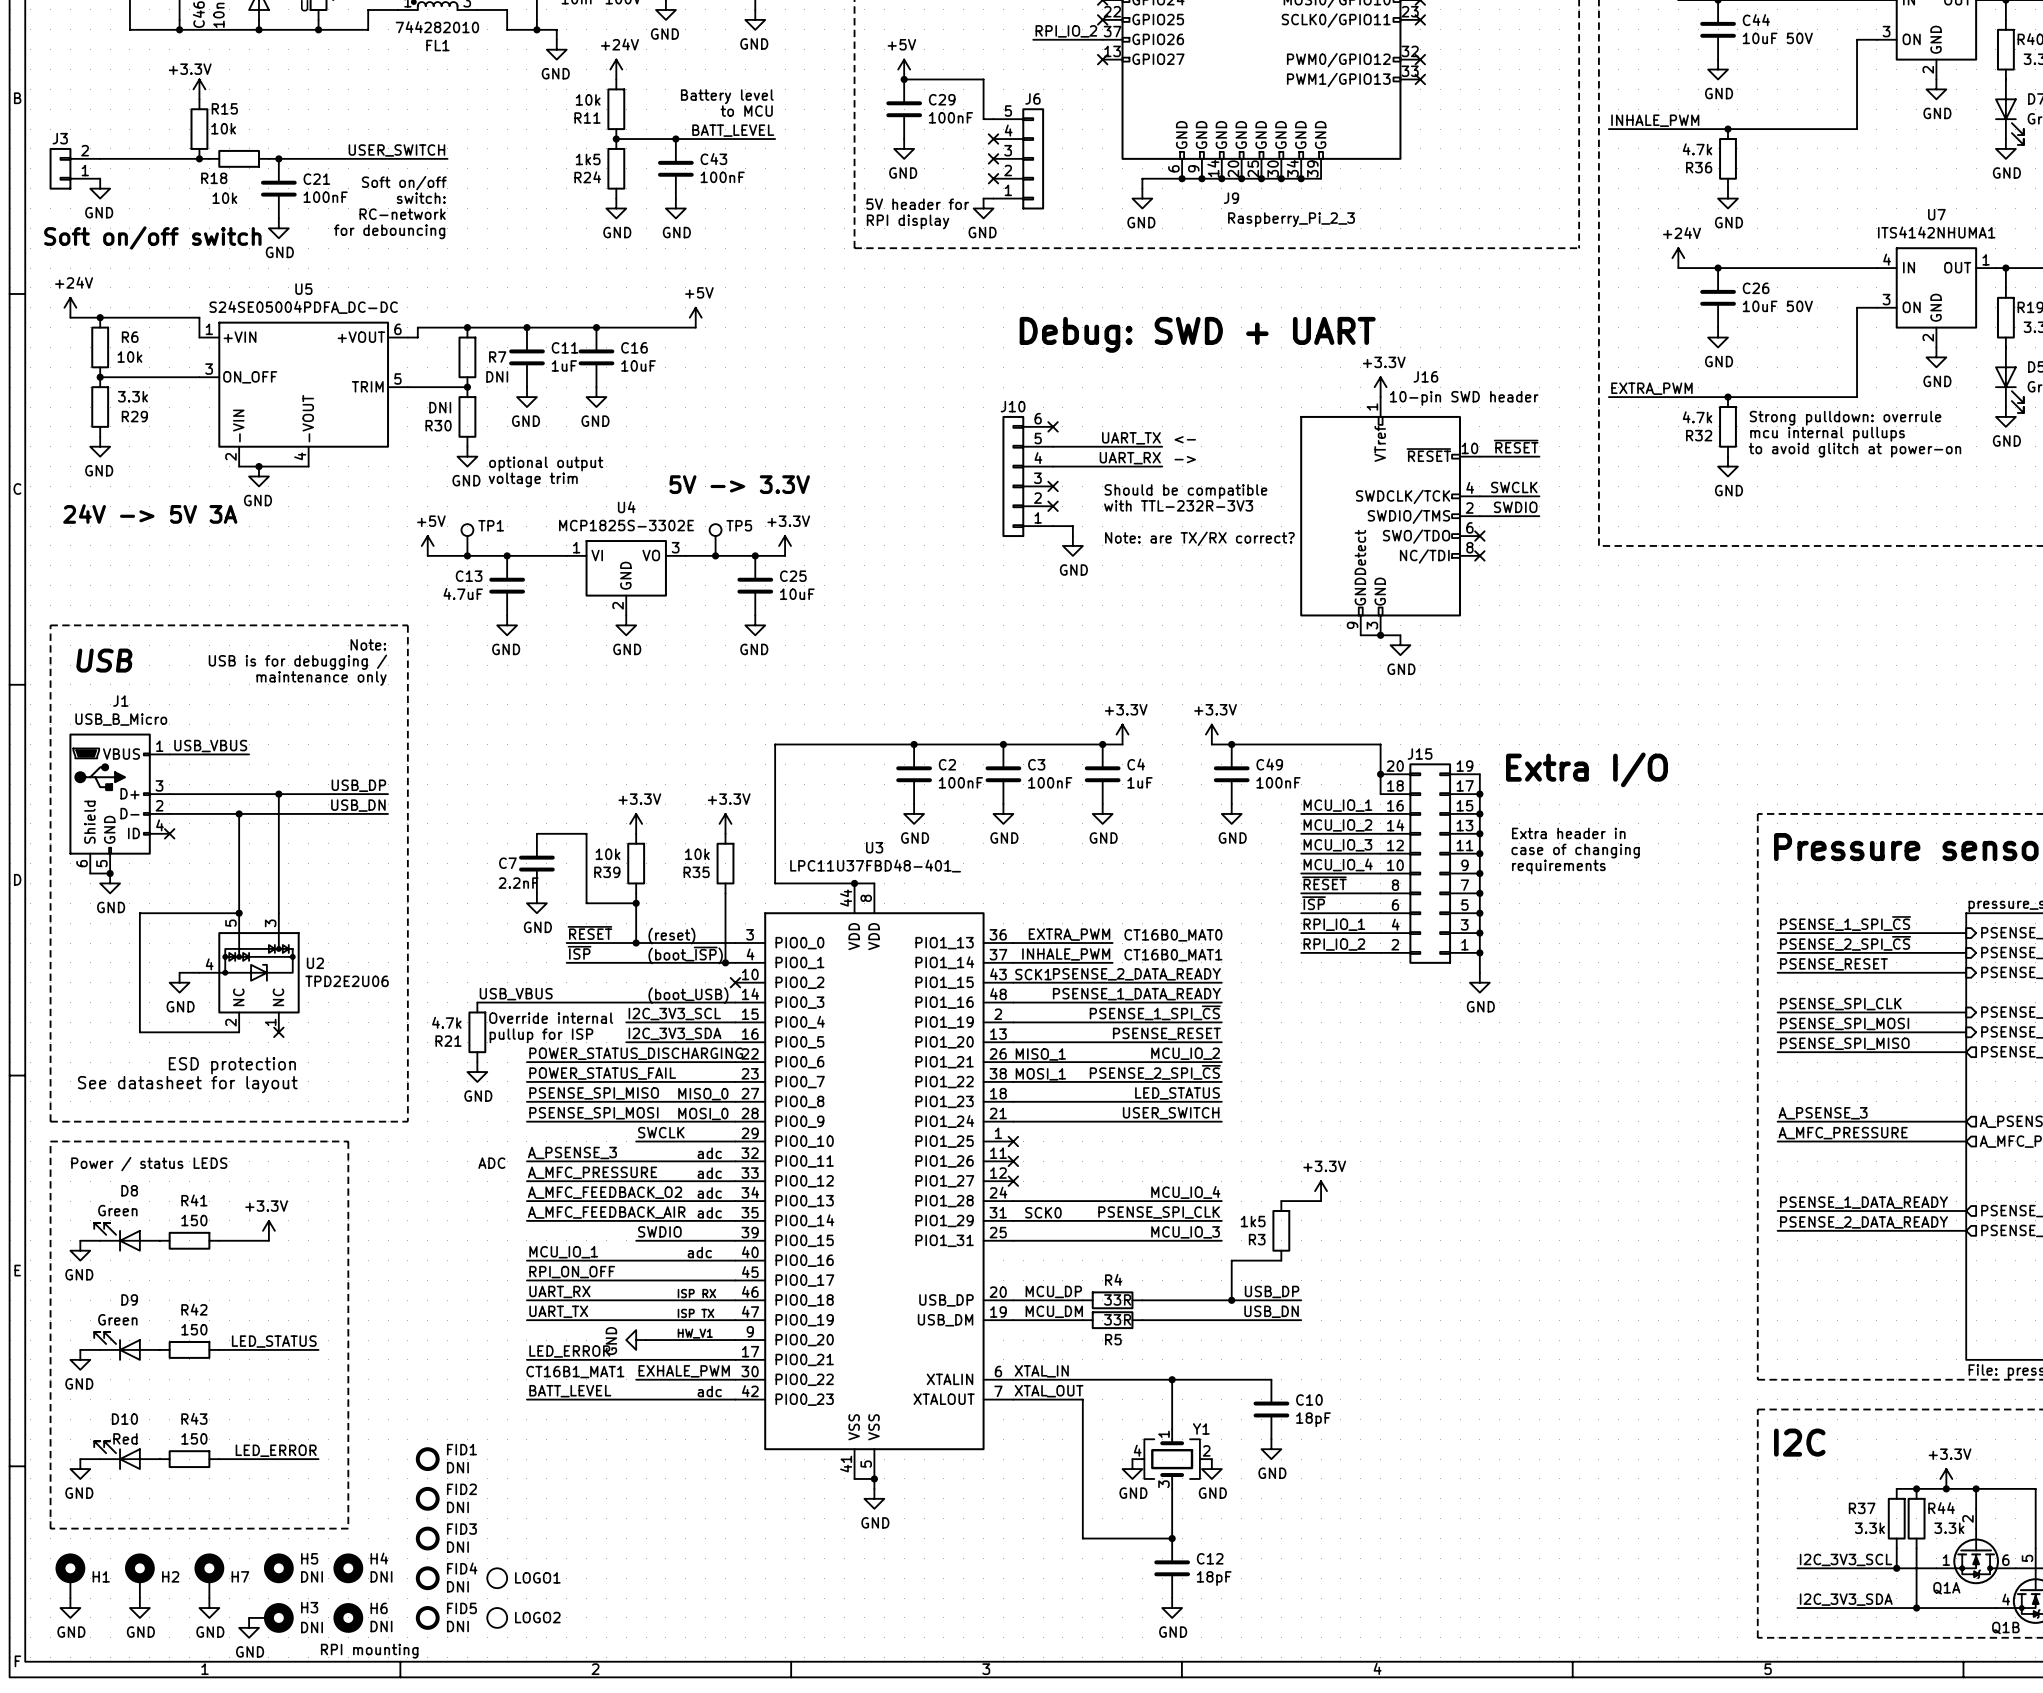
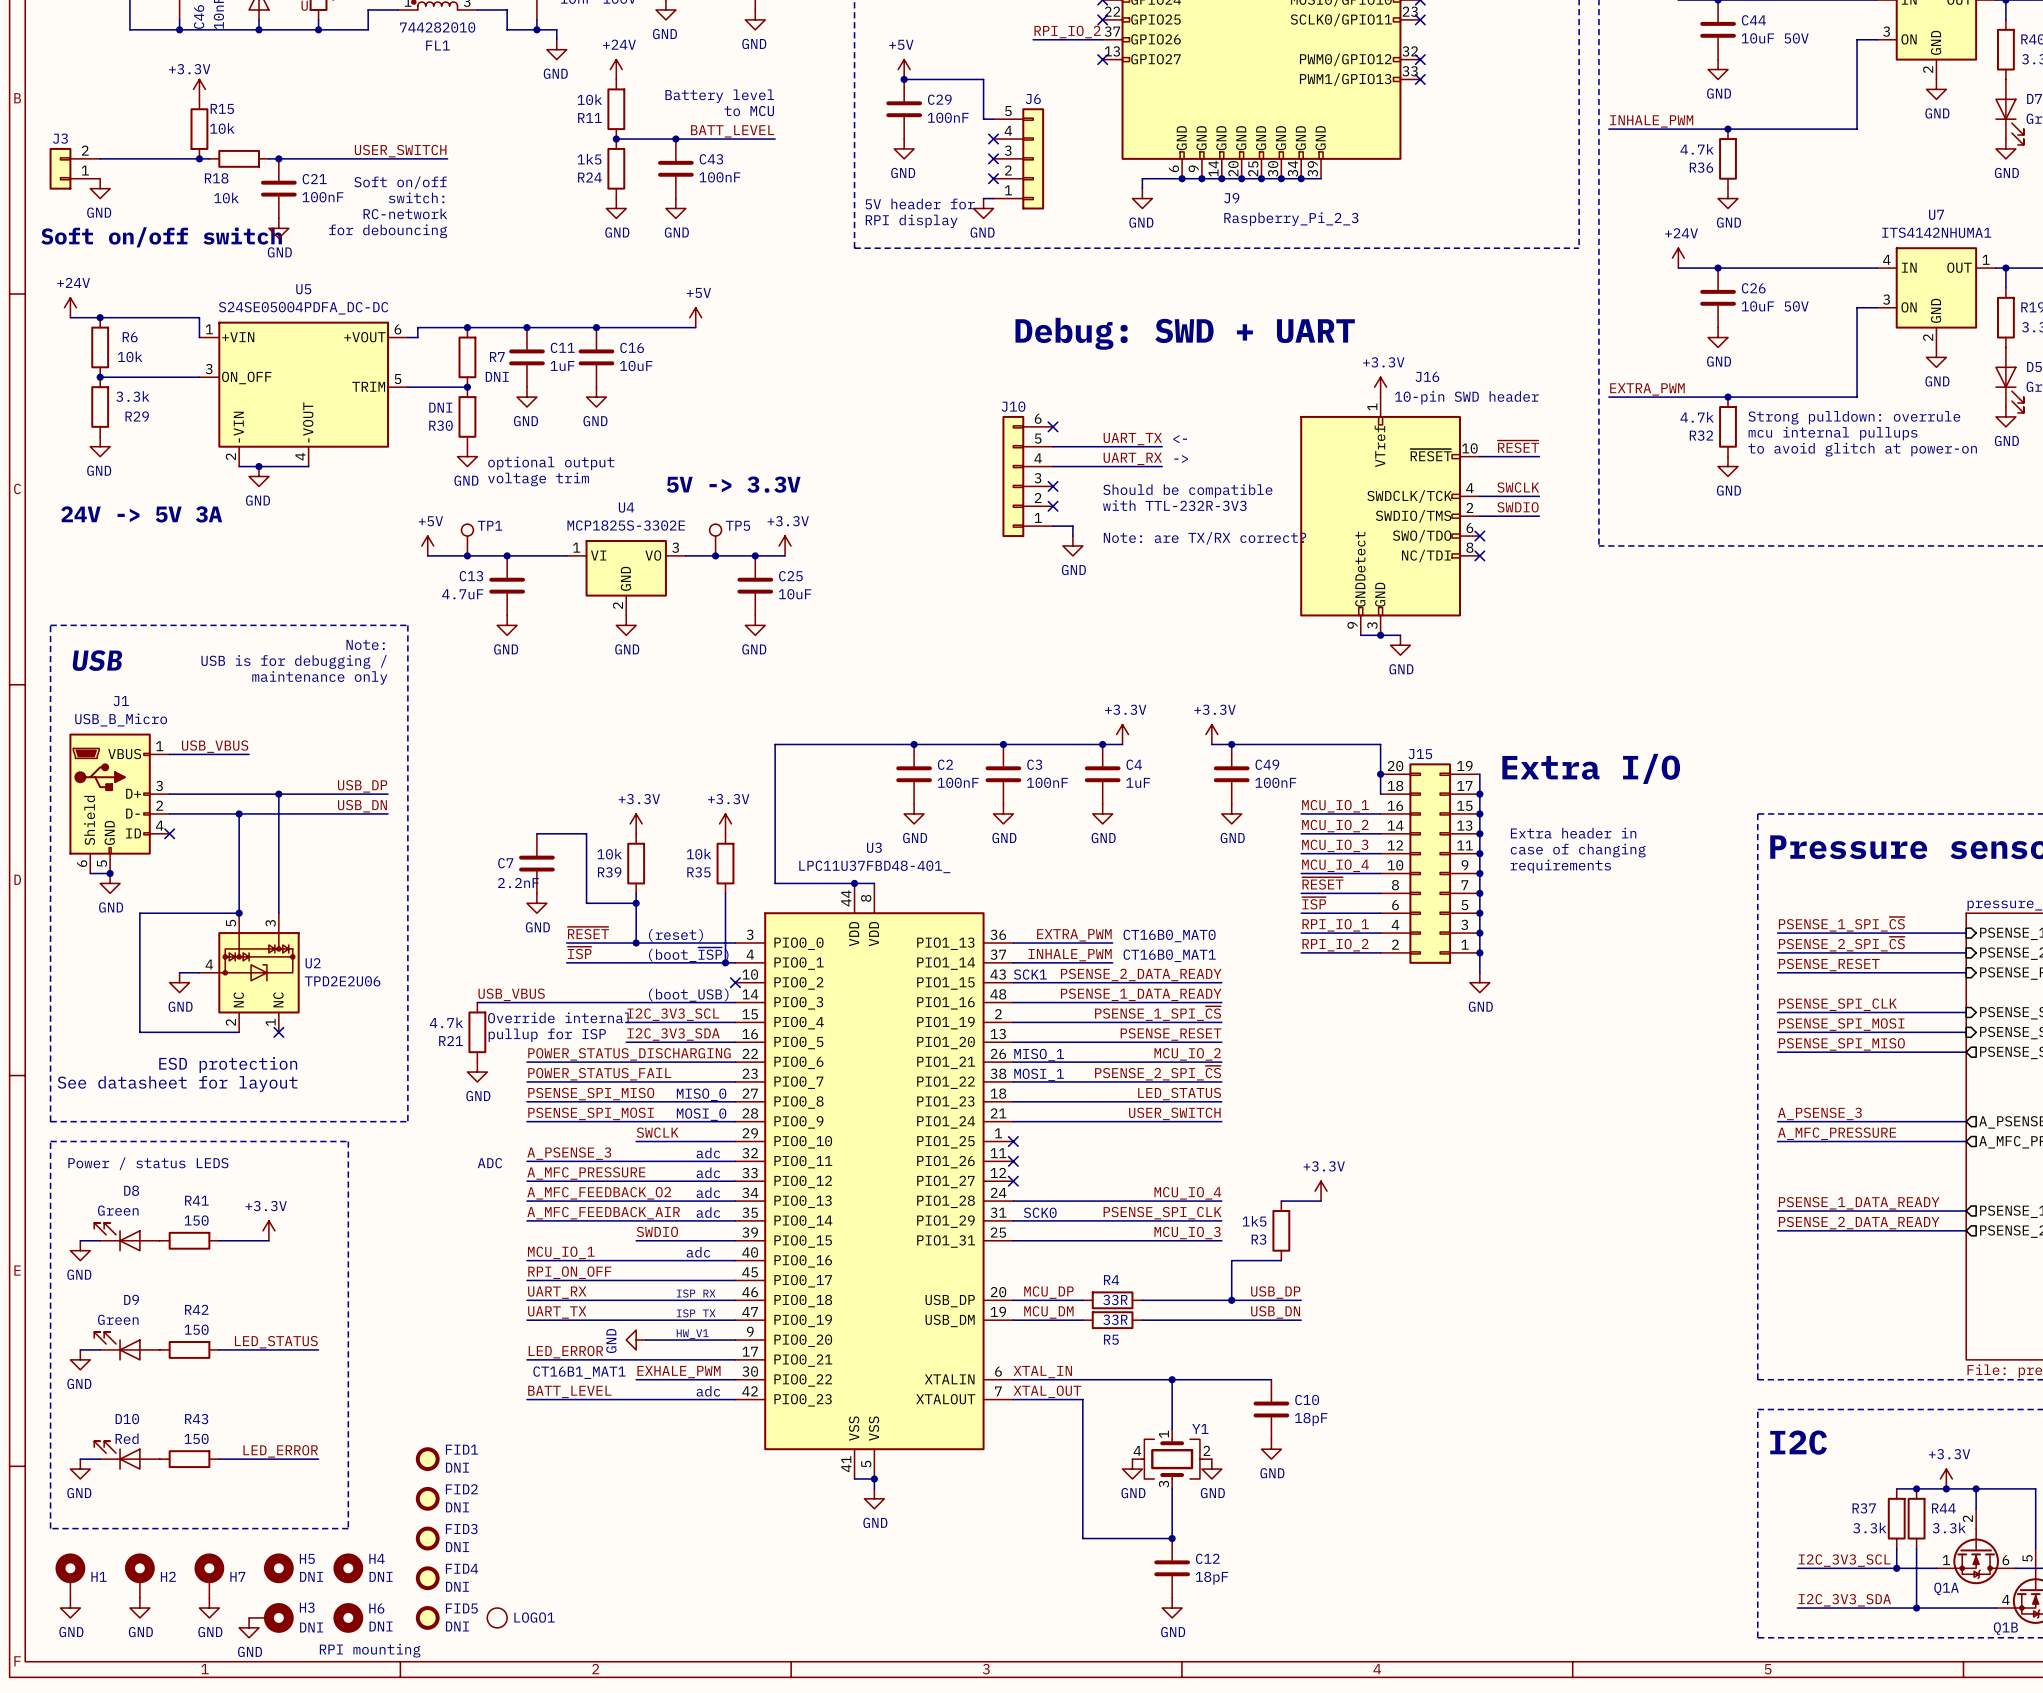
LOGO1: (497, 1578) -> none
LOGO2 name: LOGO2 (537, 1617) -> LOGO1 (534, 1617)

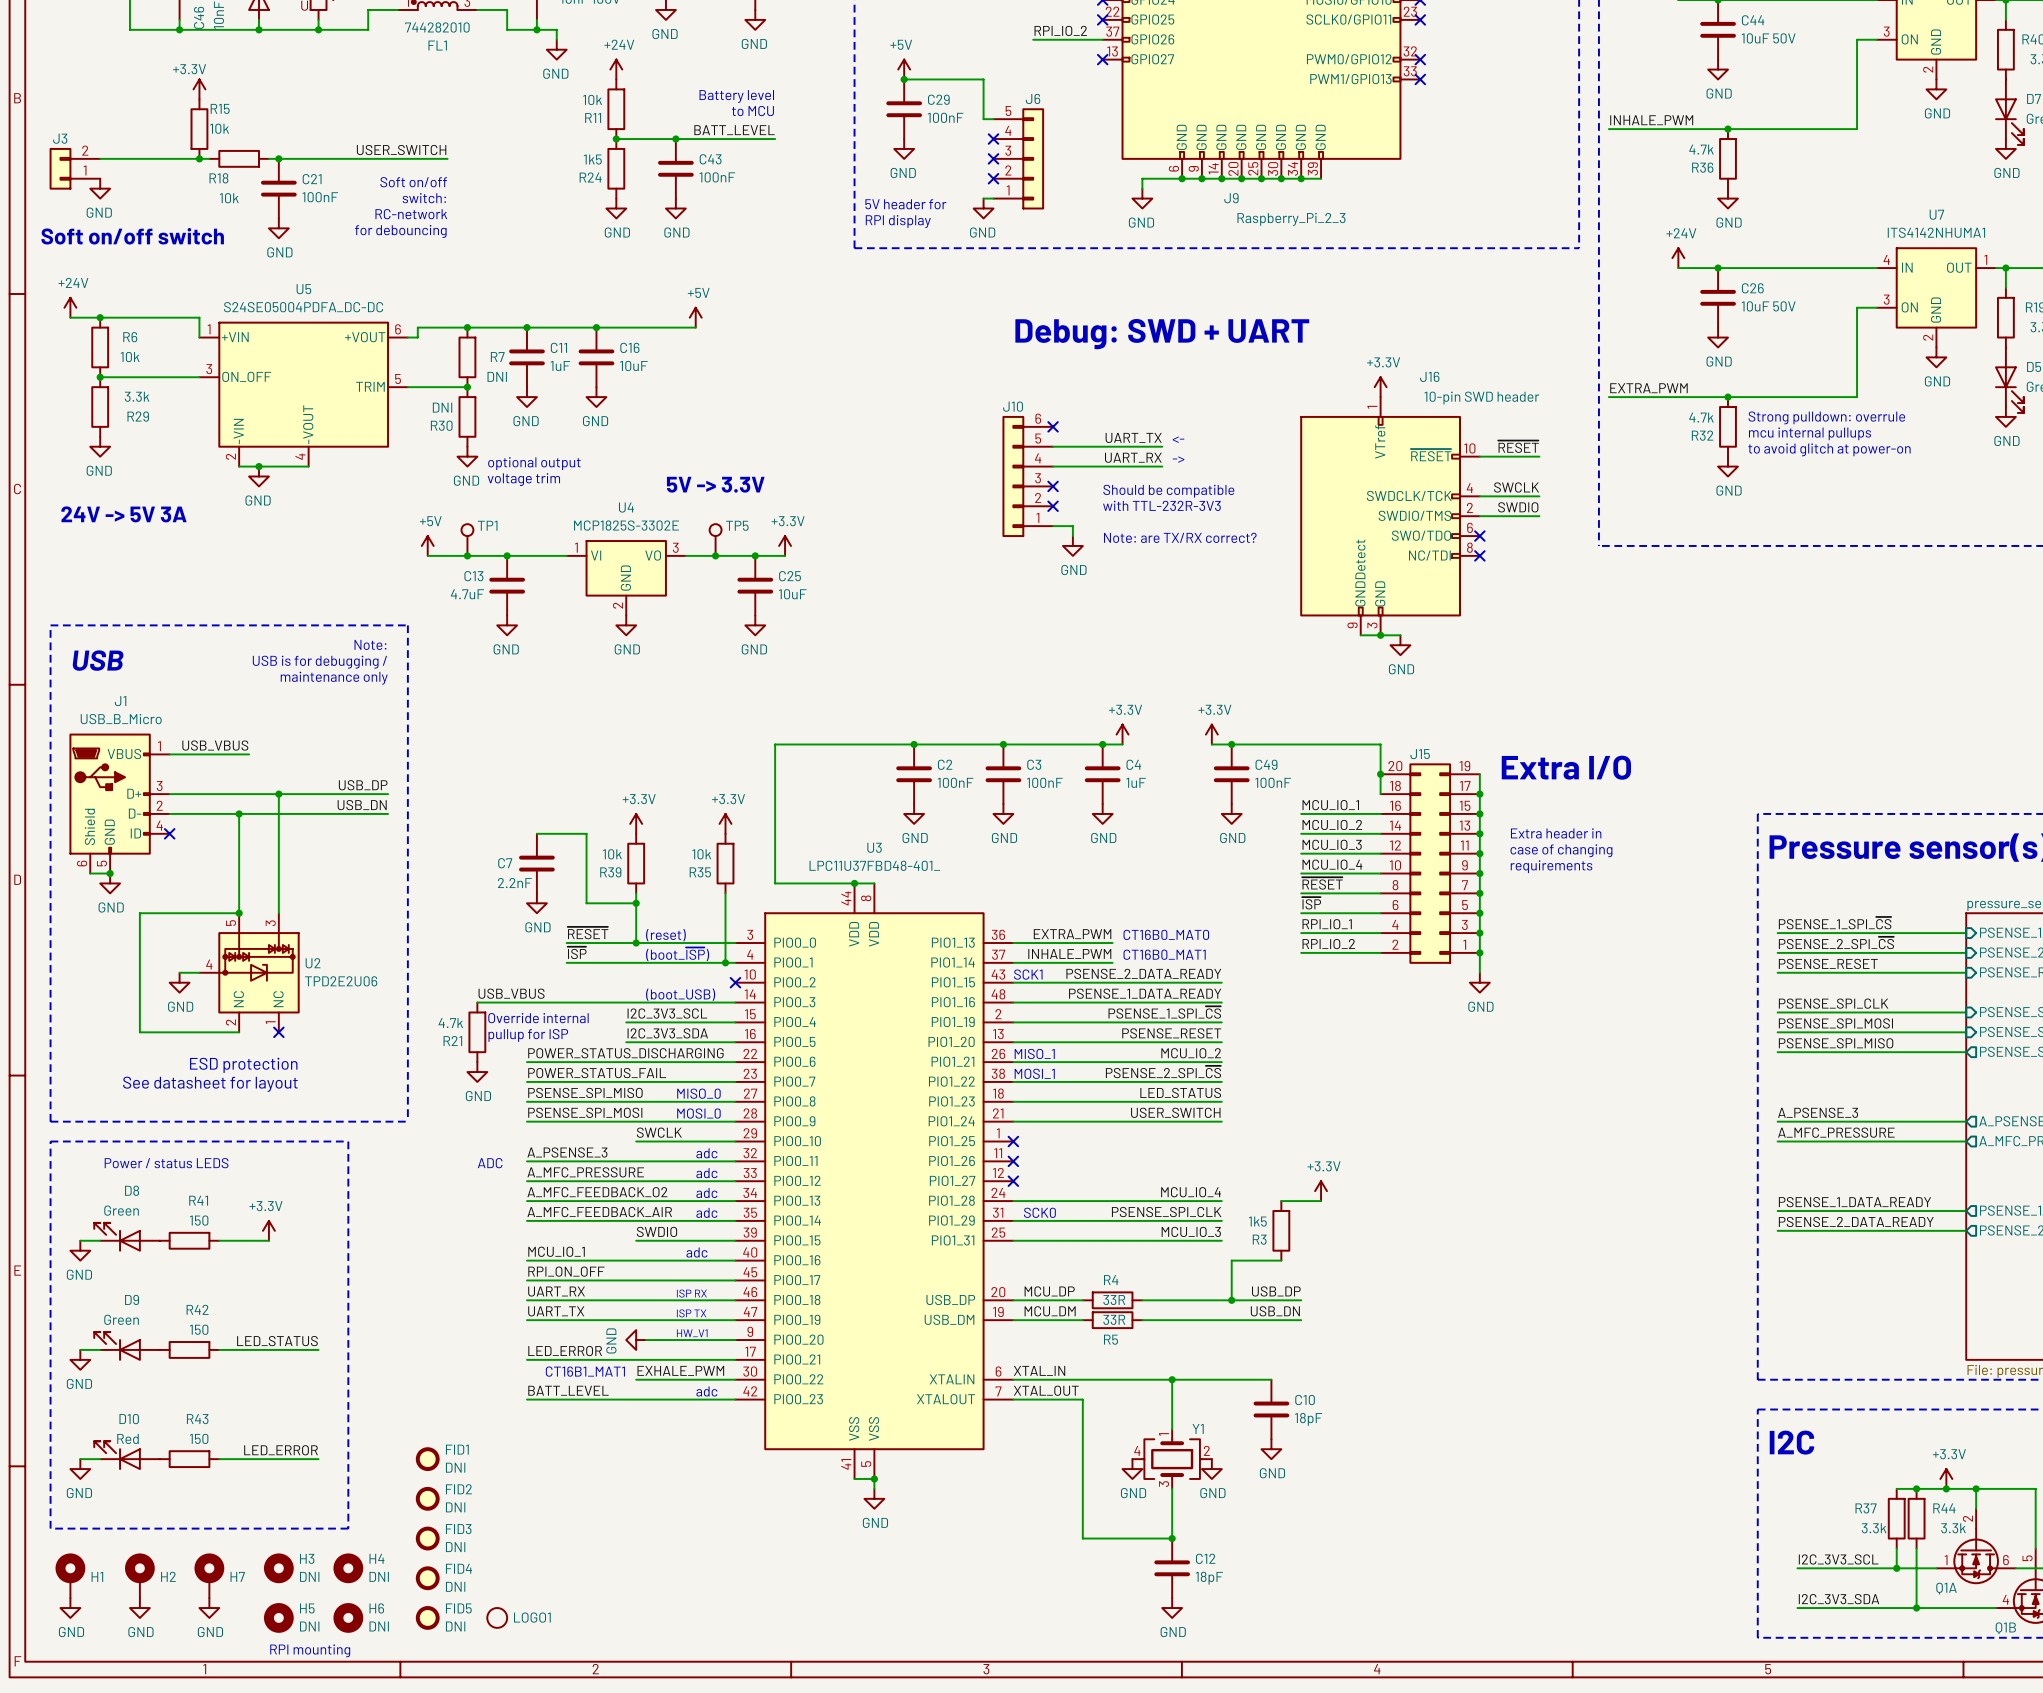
H5 name: H5 (307, 1558) -> H3 (307, 1558)
H3: DNI (271, 1617) -> none
H5: none -> DNI (278, 1617)
power symbol: GND (249, 1627) -> none
text position: RPI mounting (370, 1650) -> RPI mounting (310, 1650)

